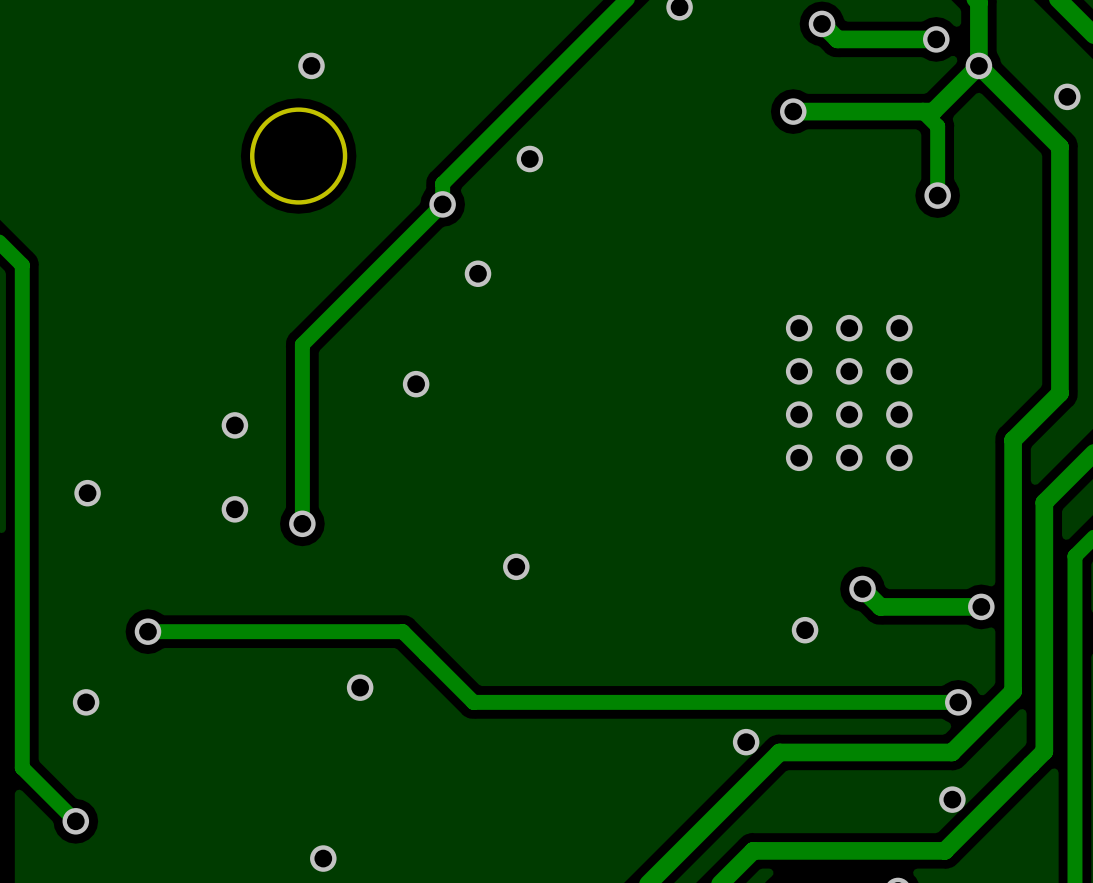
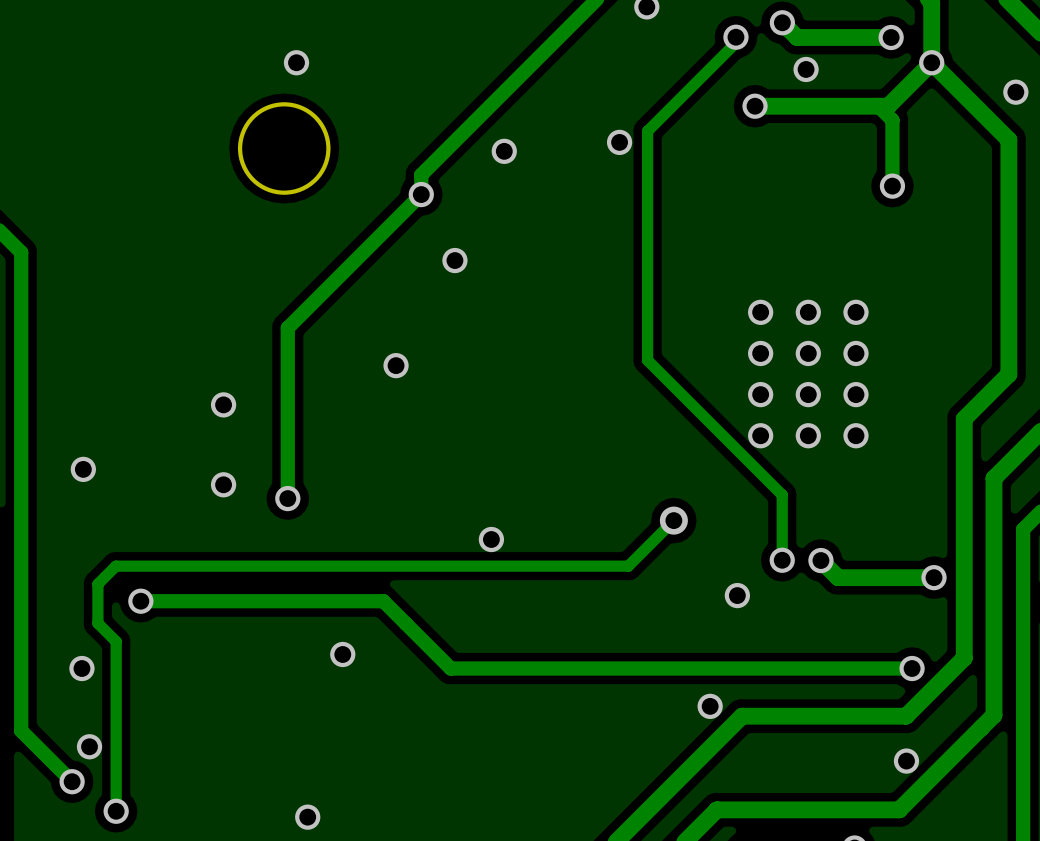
track: none -> (735, 37) (735, 42) (647, 131) (647, 360) (782, 495) (782, 560)
via: none -> (735, 37)
via: none -> (806, 69)
via: none -> (619, 142)
track: none -> (673, 520) (628, 566) (115, 566) (97, 584) (97, 623) (116, 641) (116, 811)
via: none -> (673, 520)
via: none -> (782, 560)
via: none -> (737, 595)
via: (805, 630) -> none
via: none -> (89, 746)
via: none -> (116, 811)

